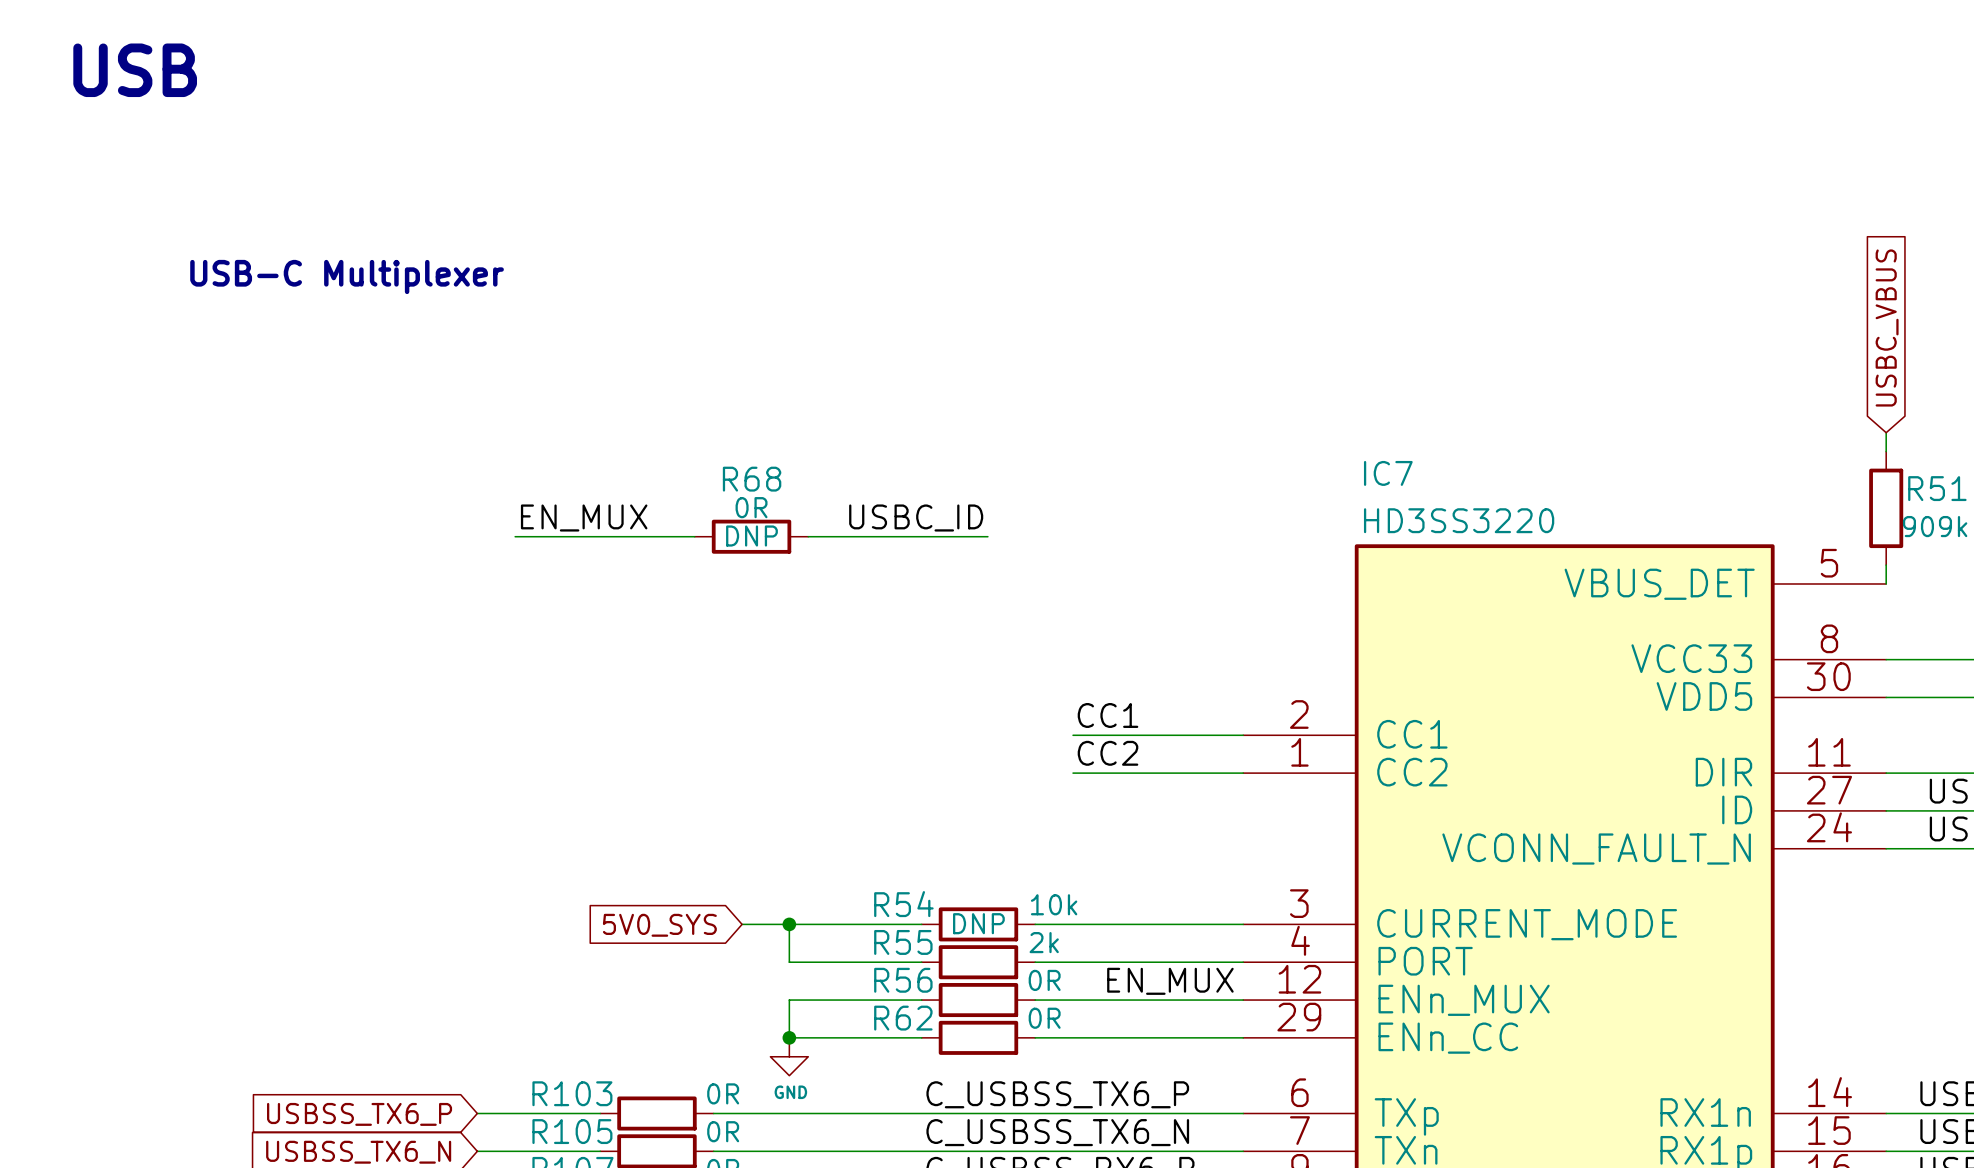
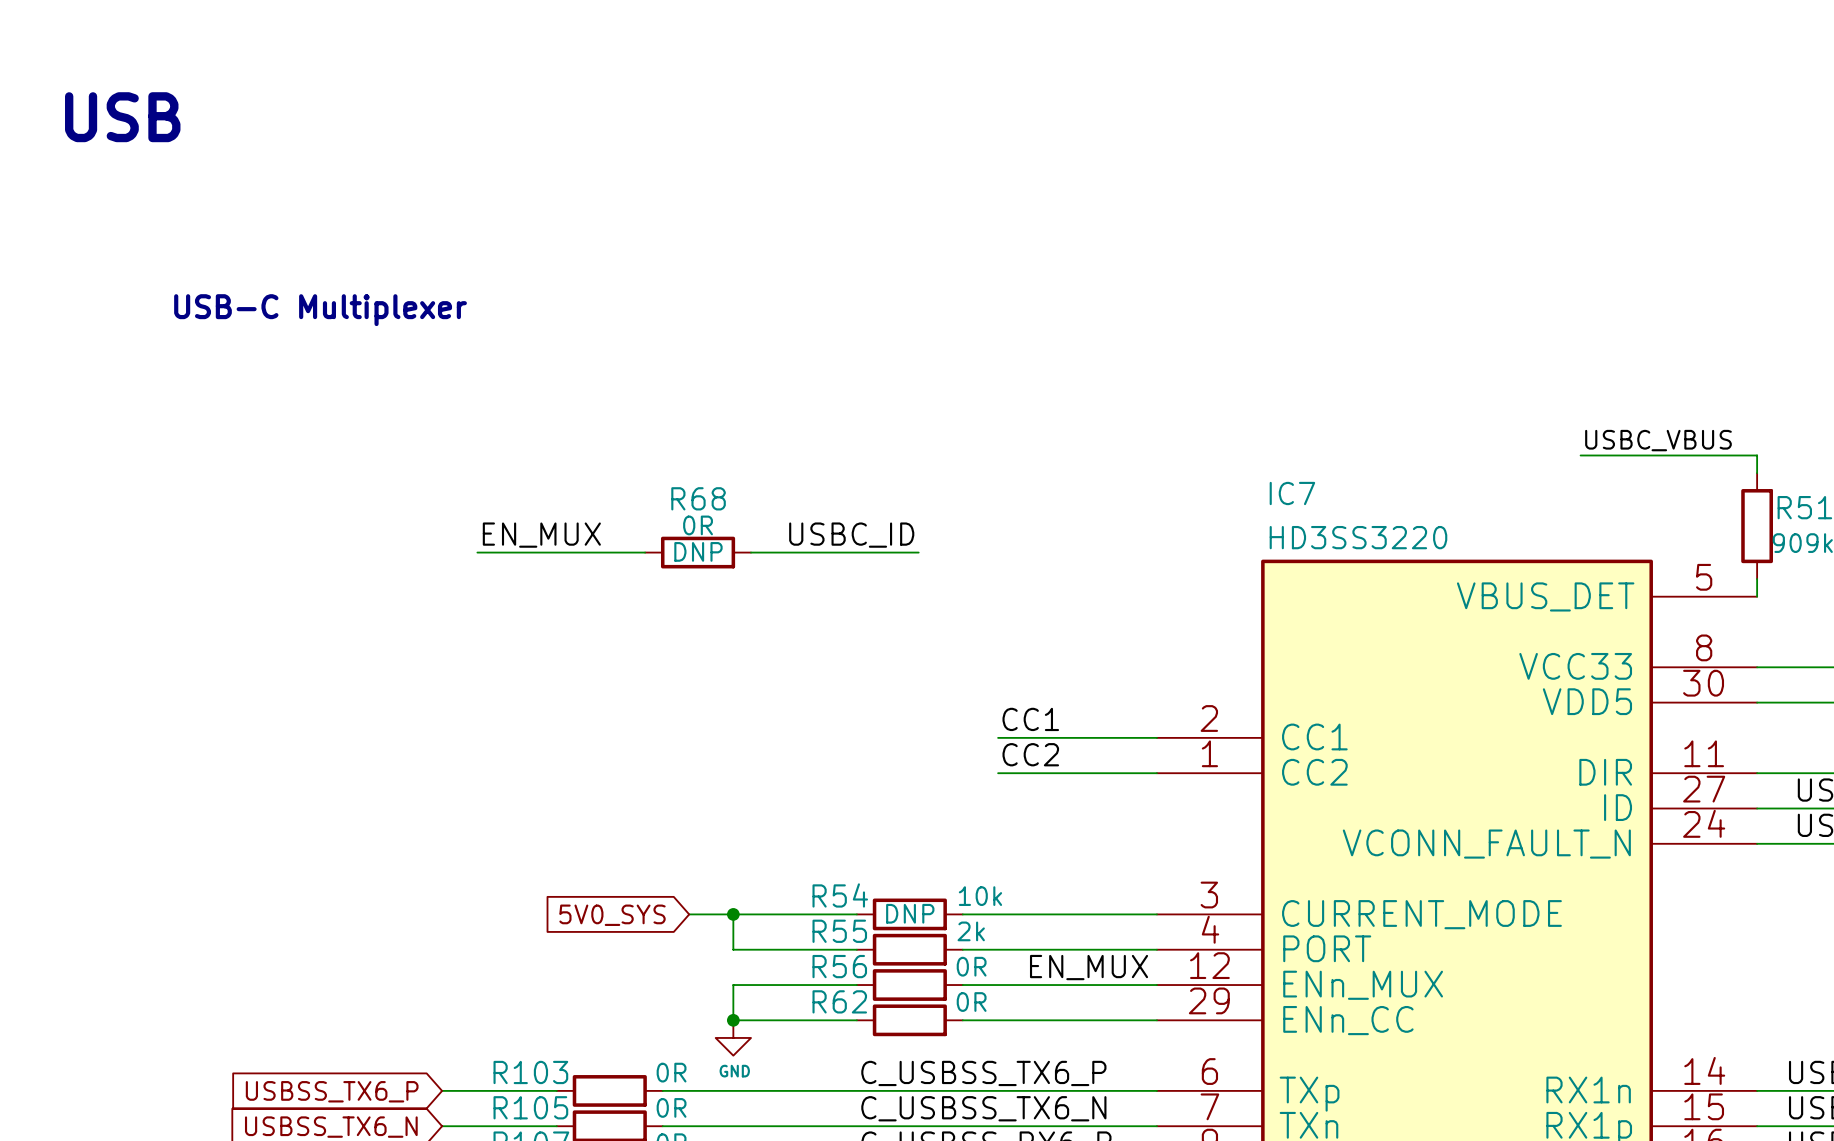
global label: USBC_VBUS (1887, 327) -> none
label: none -> USBC_VBUS (1658, 440)
wire: none -> (1580, 455) (1757, 455)

